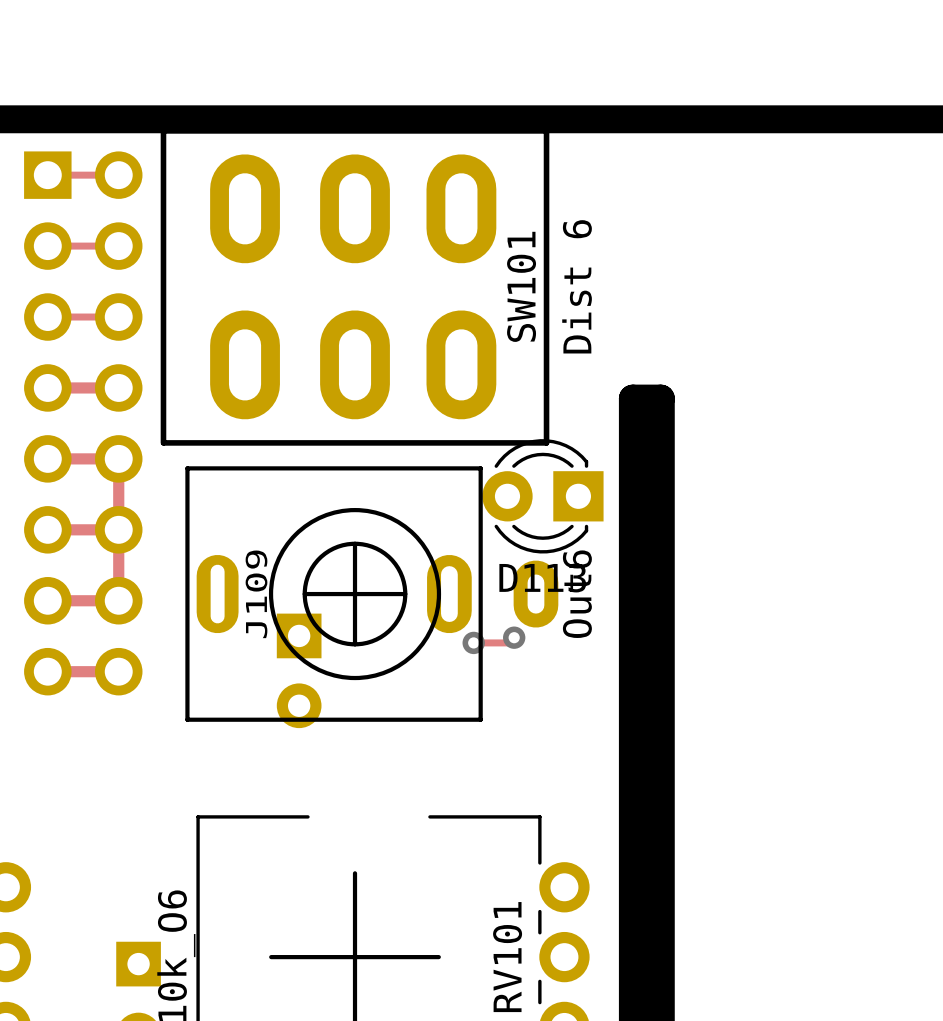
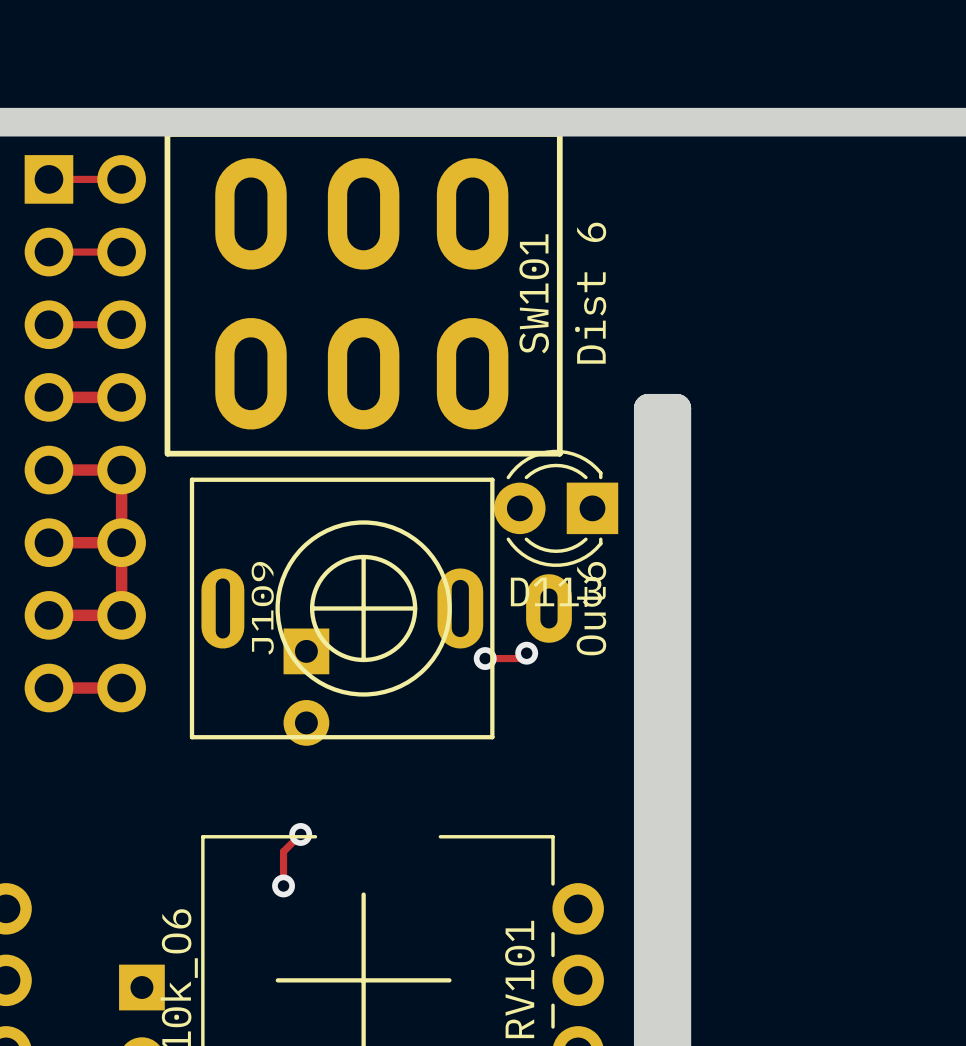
track: none -> (300, 834) (283, 851) (283, 885)
via: none -> (300, 834)
via: none -> (283, 885)

